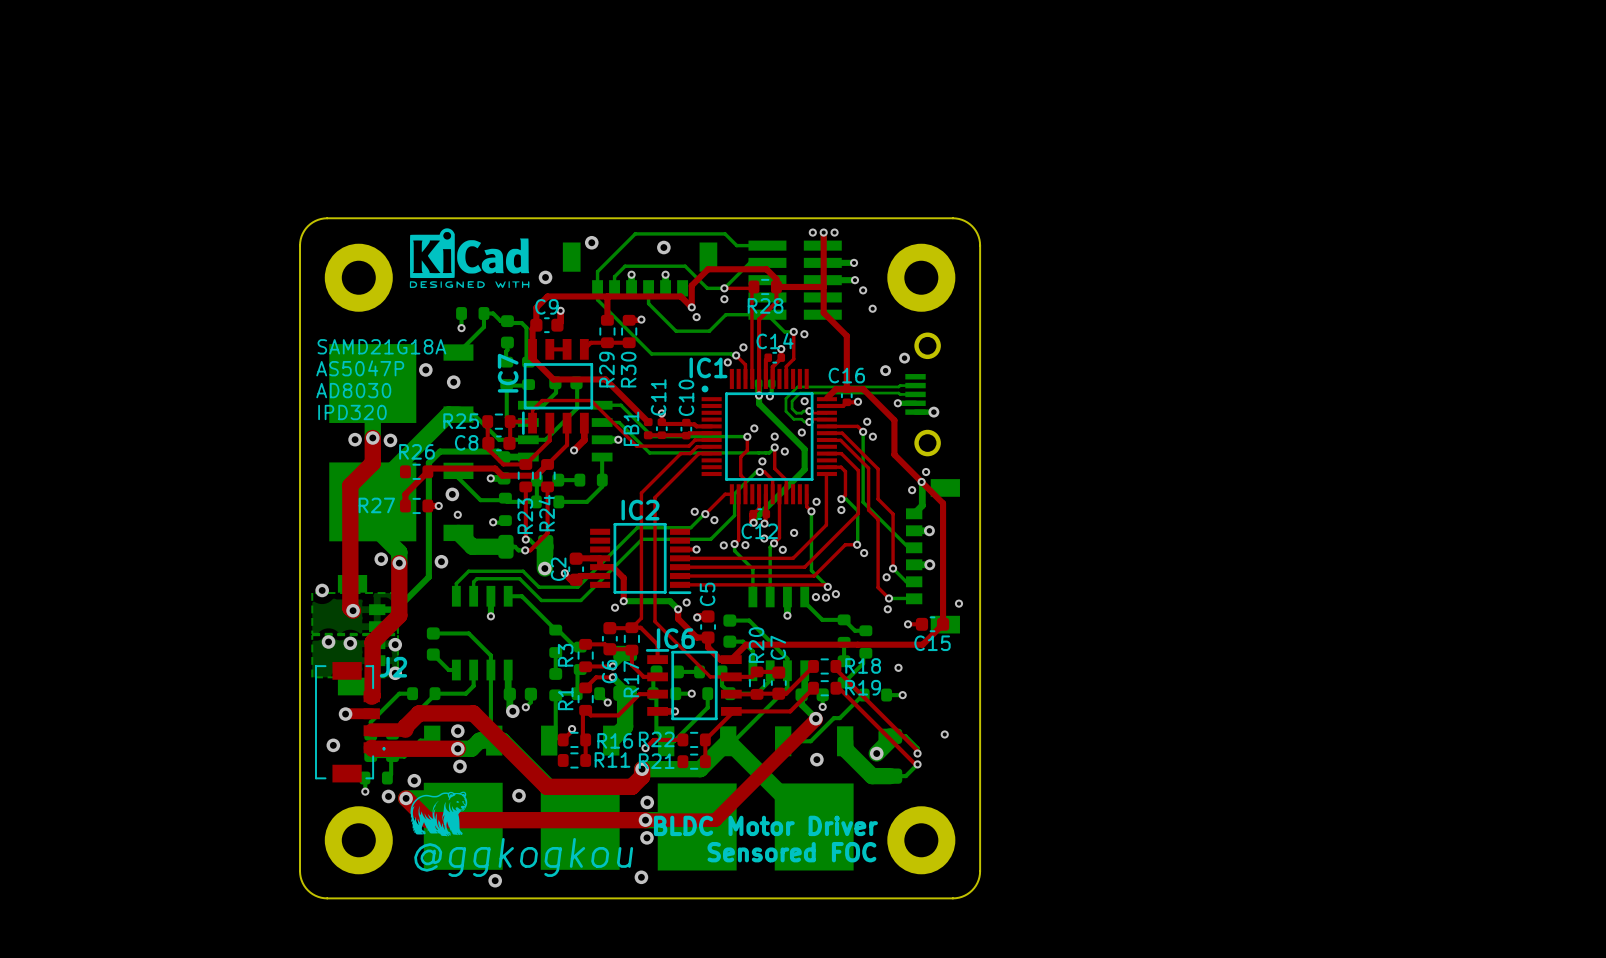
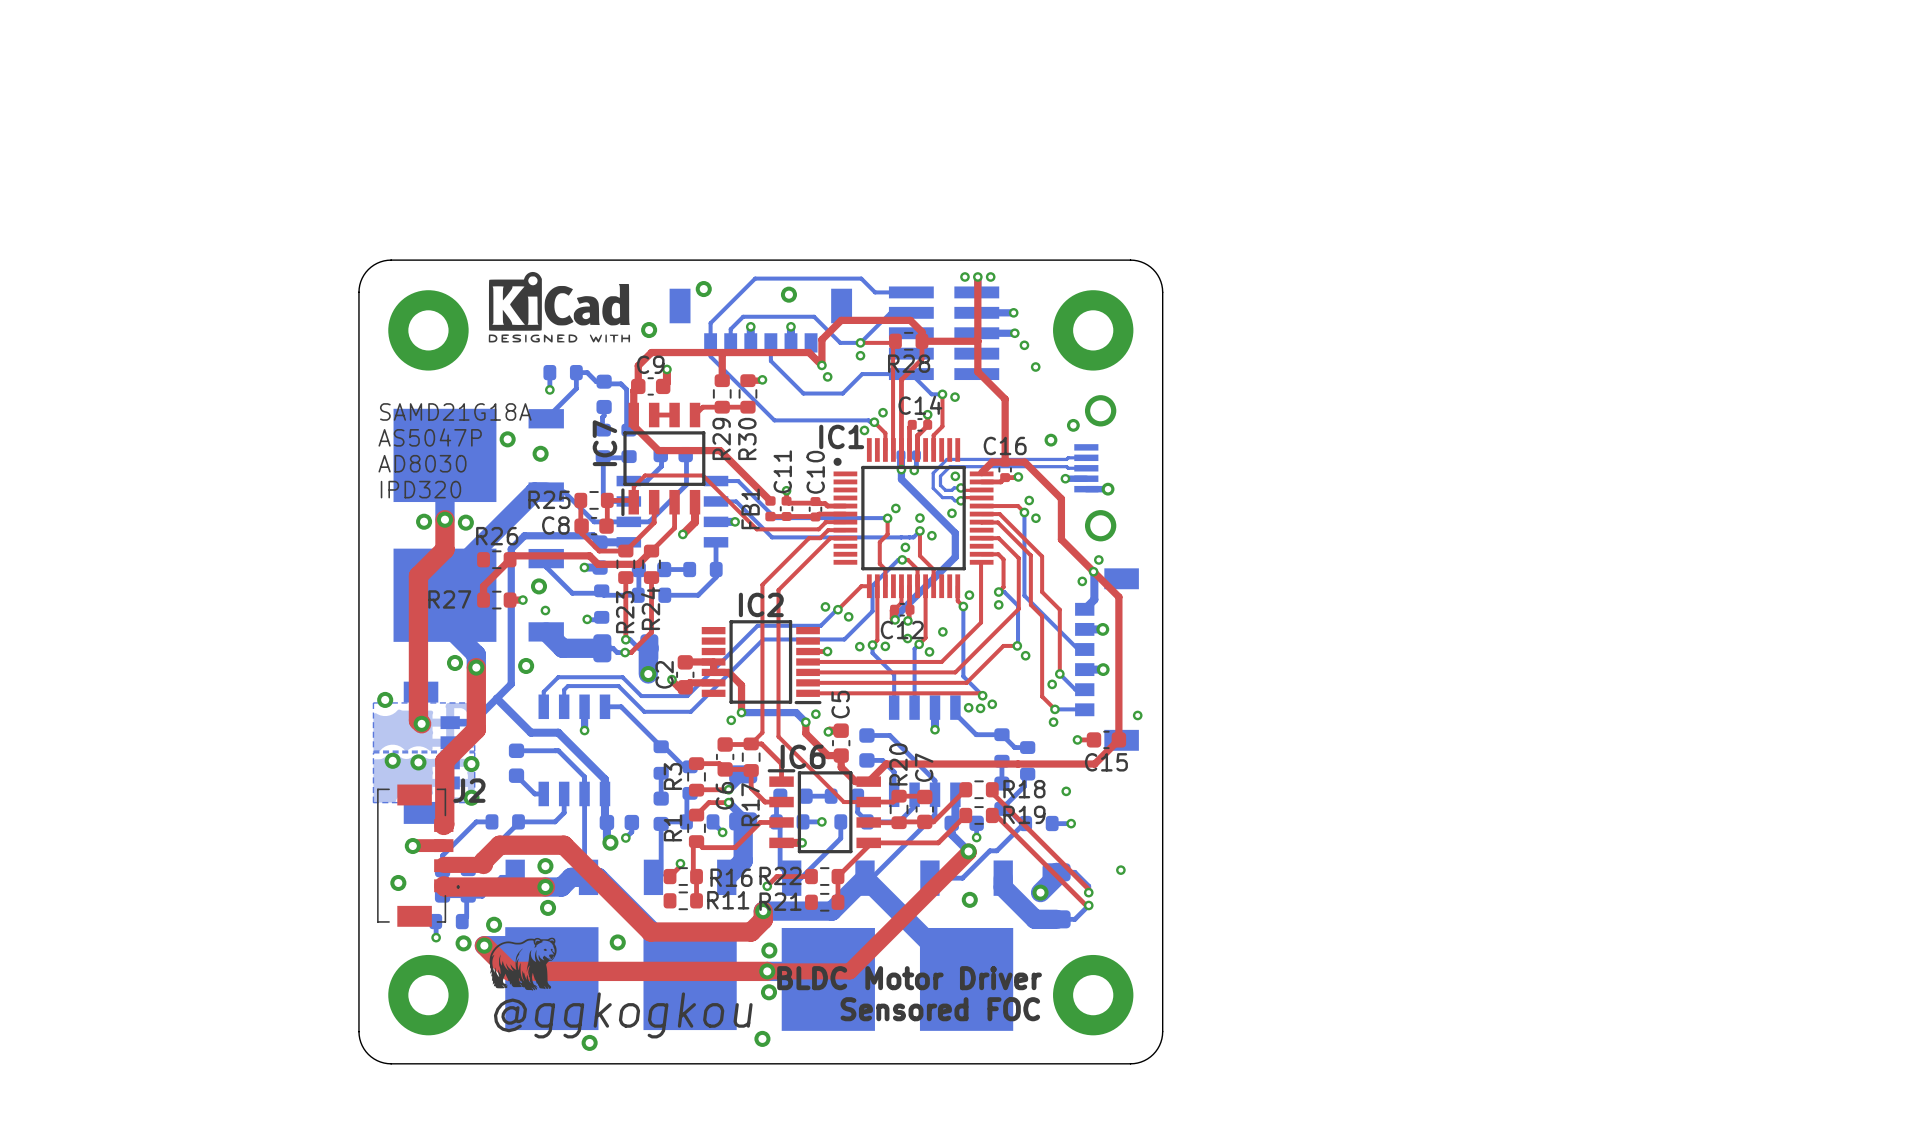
bottom track: none -> (496, 698) (530, 732) (558, 732) (604, 779) (604, 793)

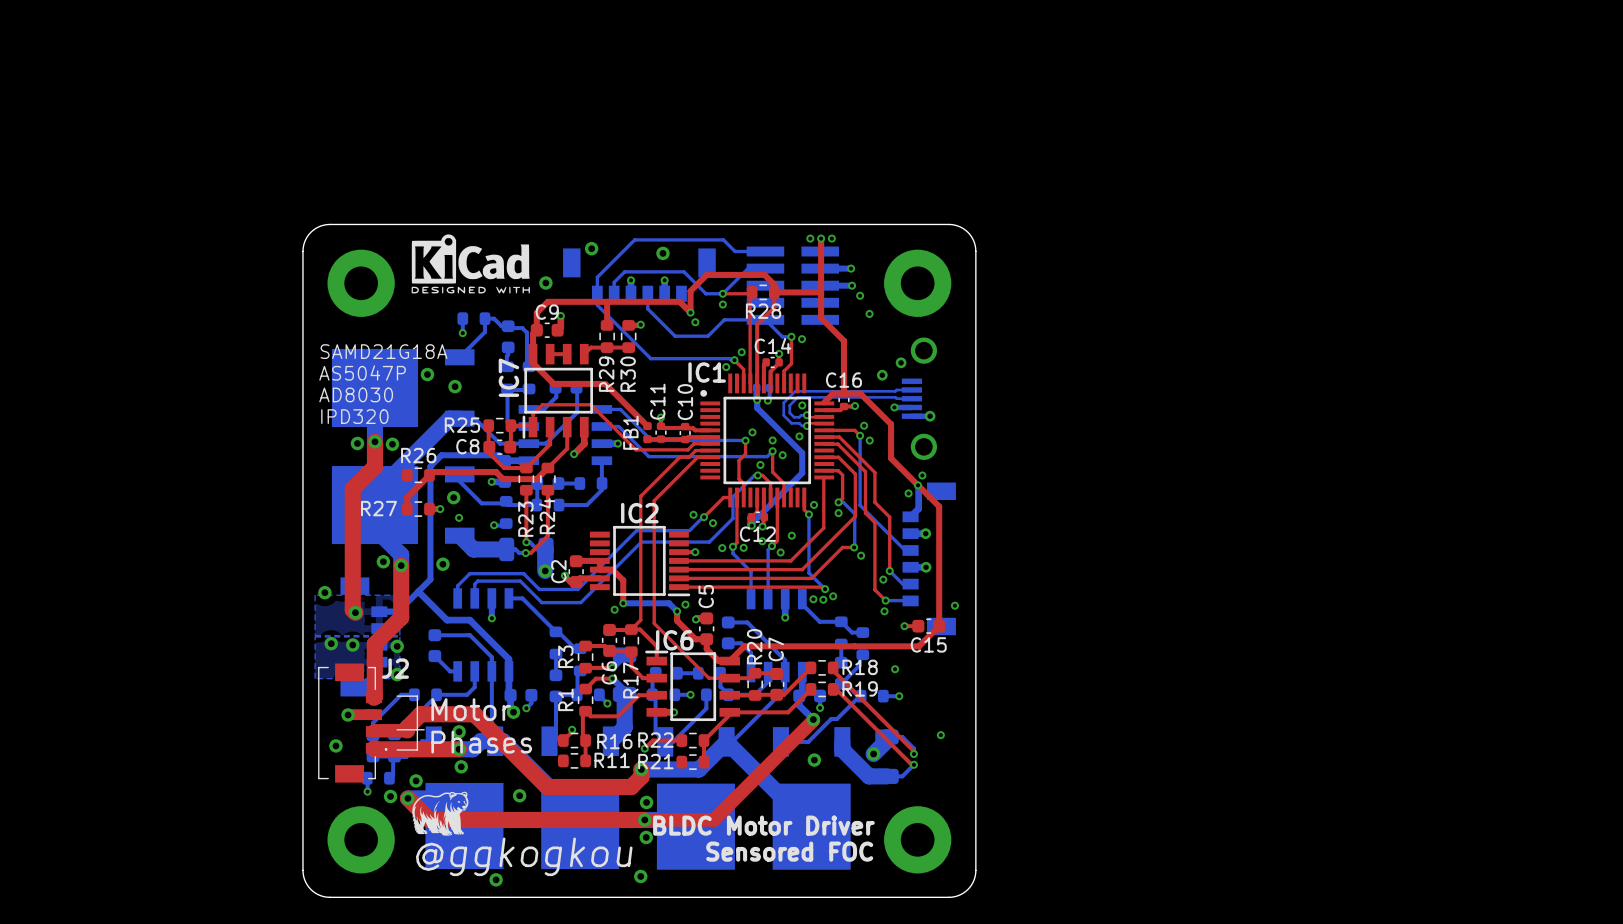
line: none -> (397, 696) (417, 696) (417, 749) (397, 749)
text: none -> Motor (471, 709)
line: none -> (397, 729) (424, 729)
text: none -> Phases (481, 742)

